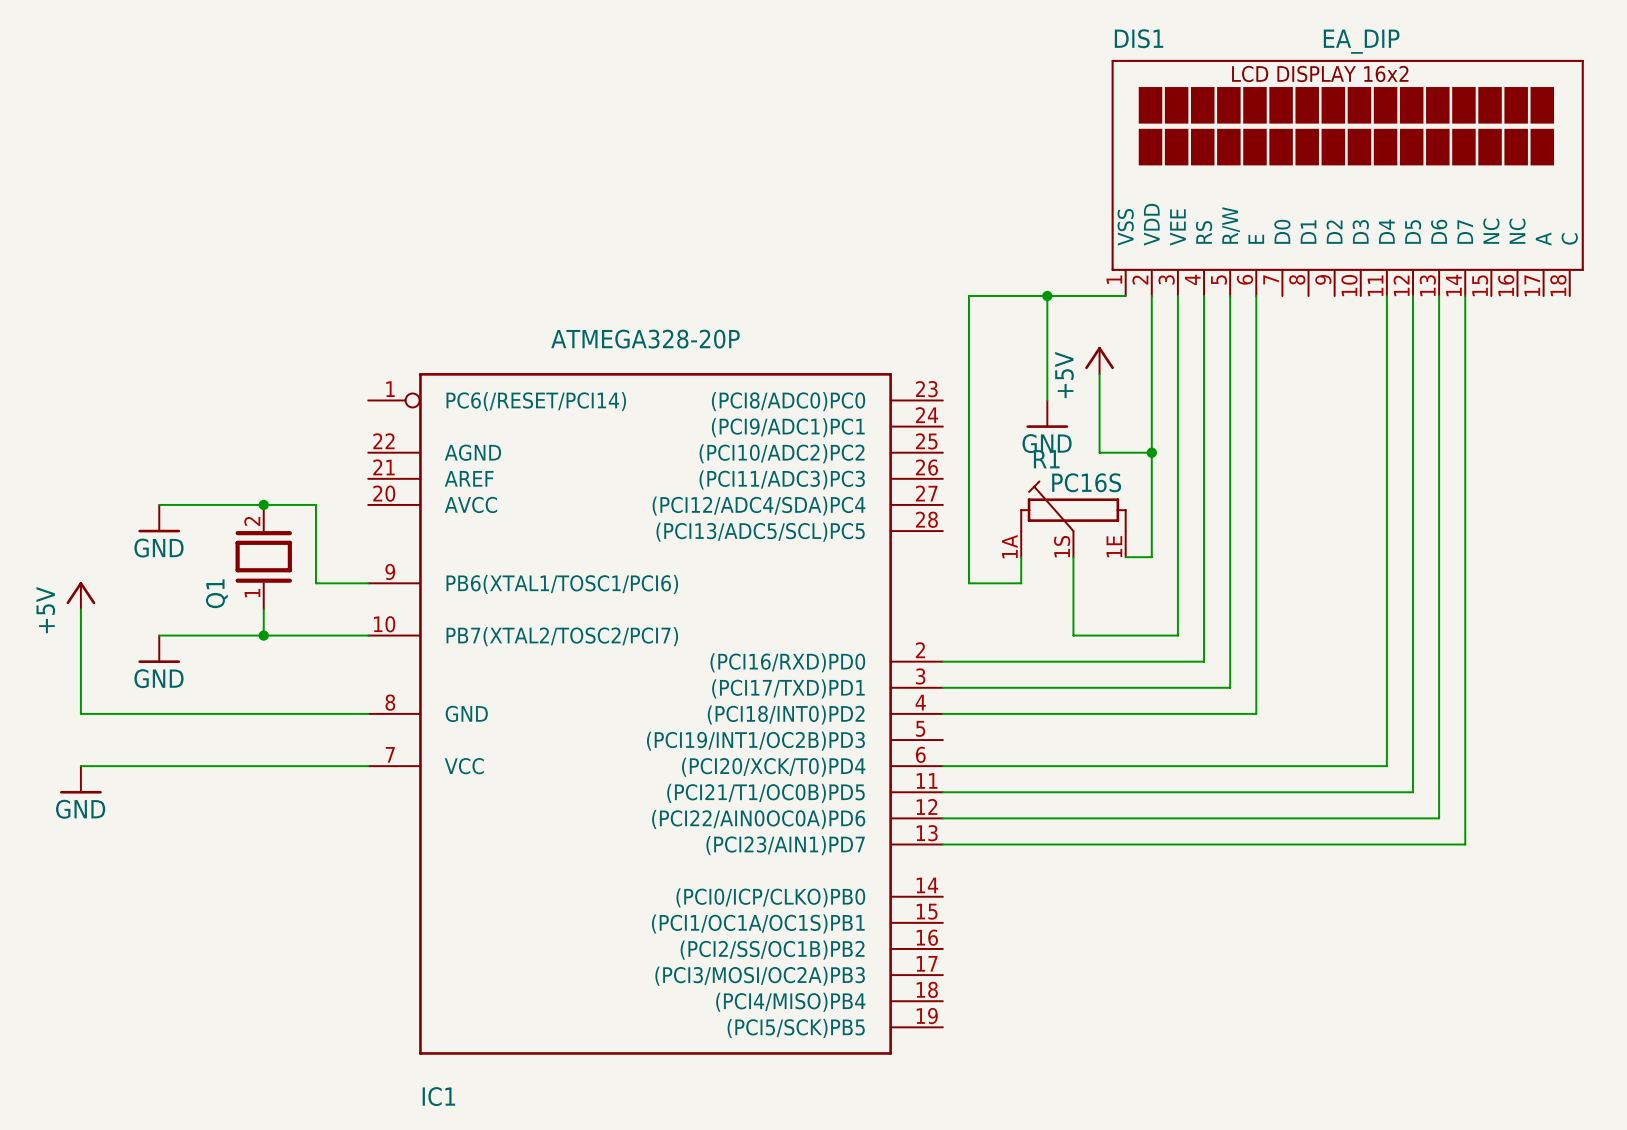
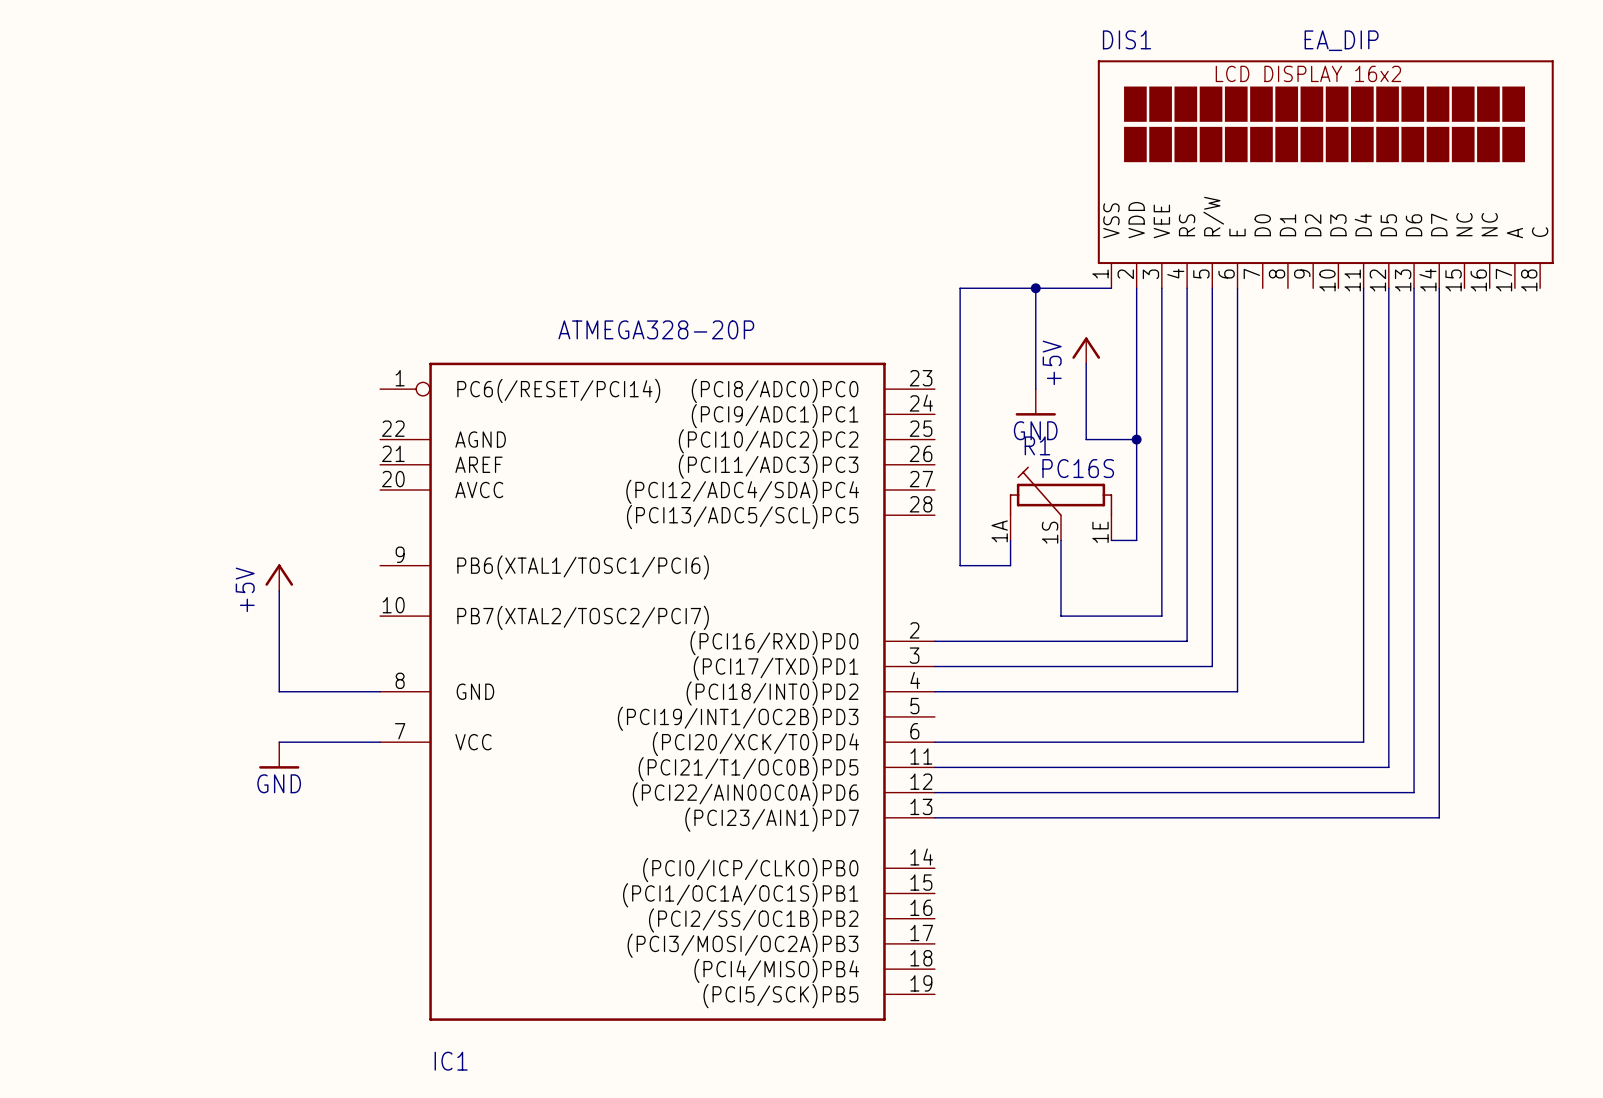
wire: (159, 504) (315, 504) (315, 583) (368, 583) -> none
junction: (263, 504) -> none
power symbol: GND (159, 518) -> none
Q1: (263, 557) -> none
power symbol position: +5V (80, 595) -> +5V (279, 577)
wire: (80, 609) (80, 713) (263, 713) -> (279, 616) (279, 691)
wire: (159, 635) (368, 635) -> none
junction: (263, 635) -> none
power symbol: GND (159, 649) -> none
wire: (80, 766) (263, 766) -> none
power symbol: GND (80, 779) -> none
power symbol: none -> GND (279, 755)

